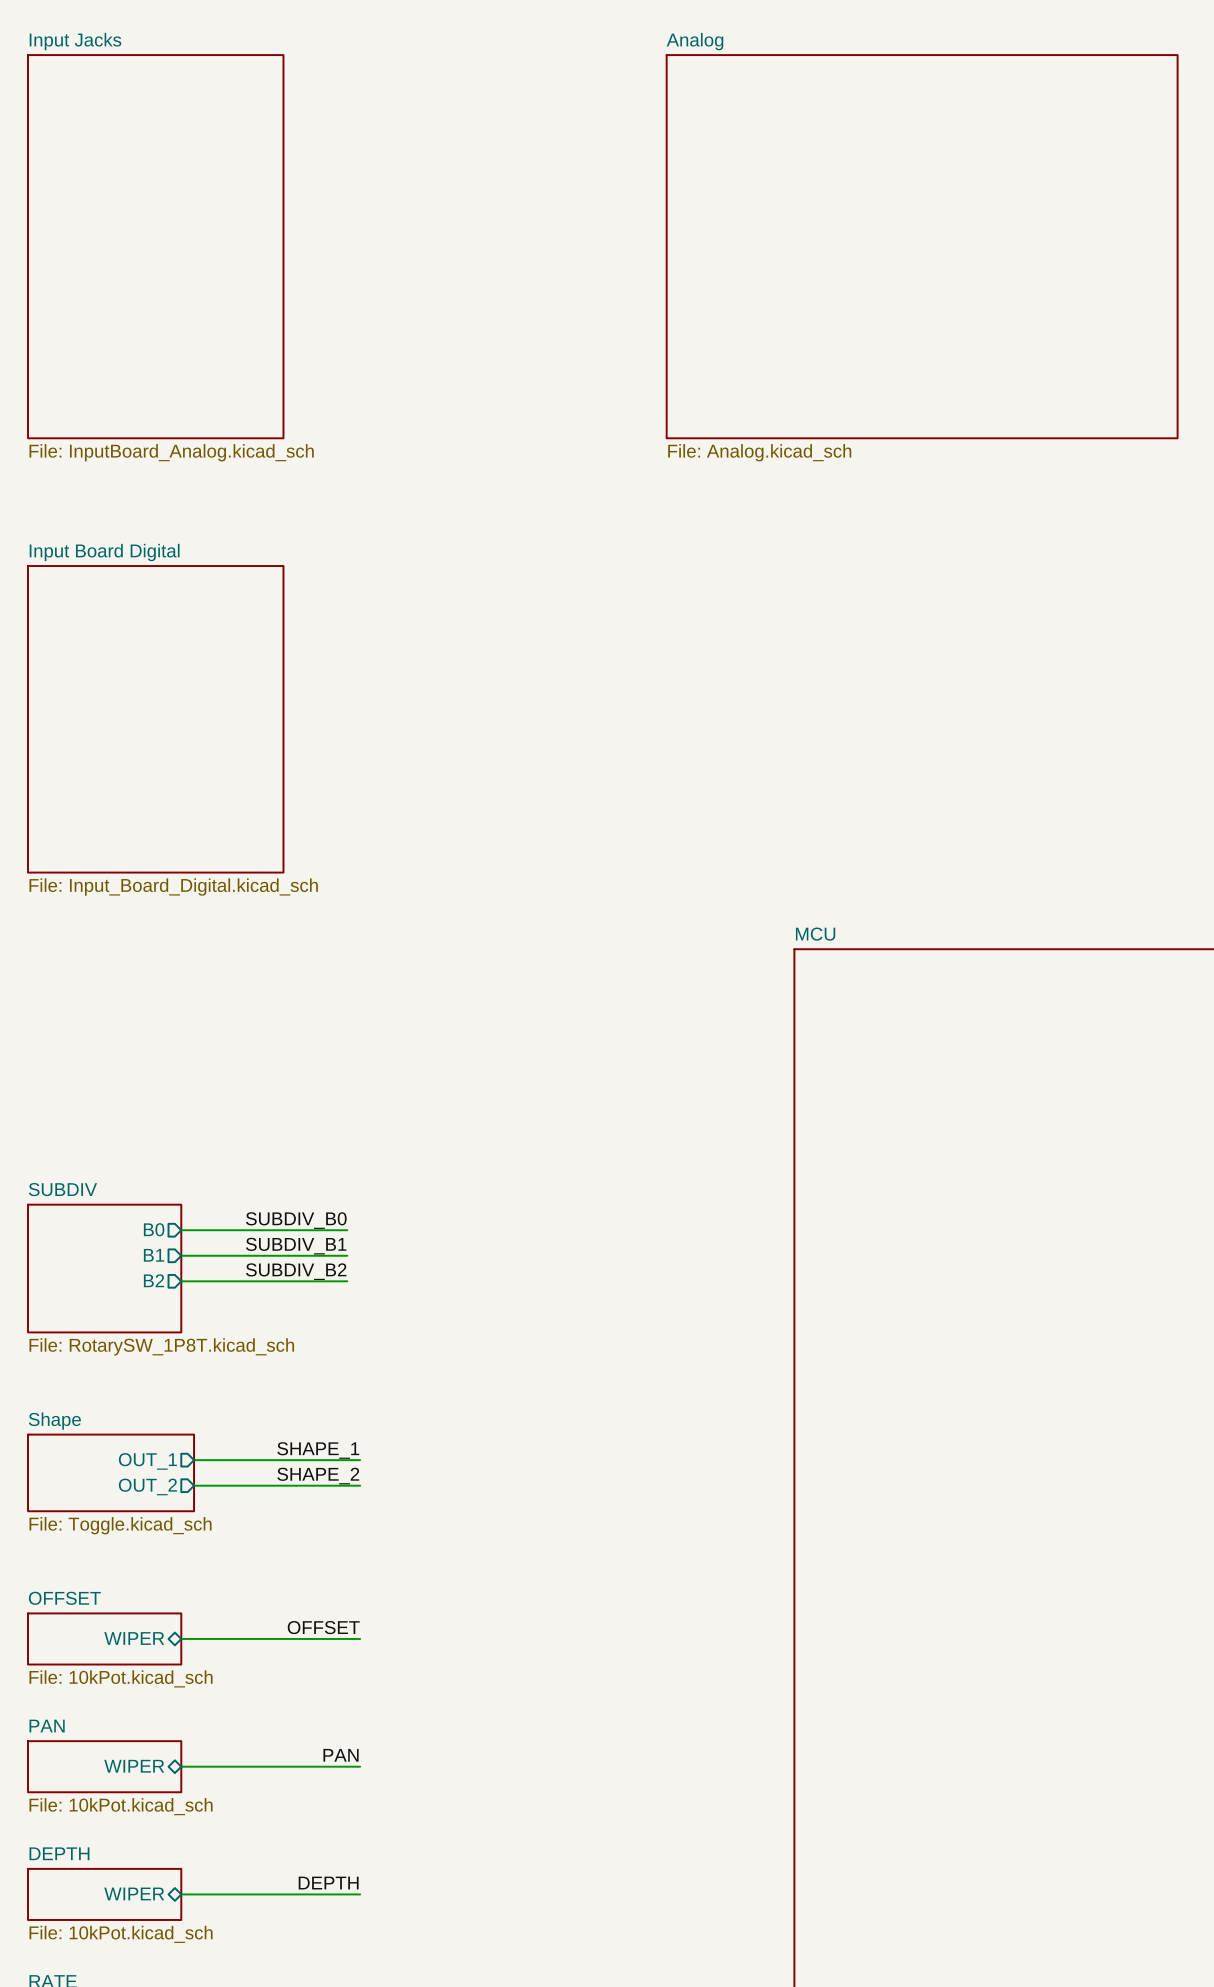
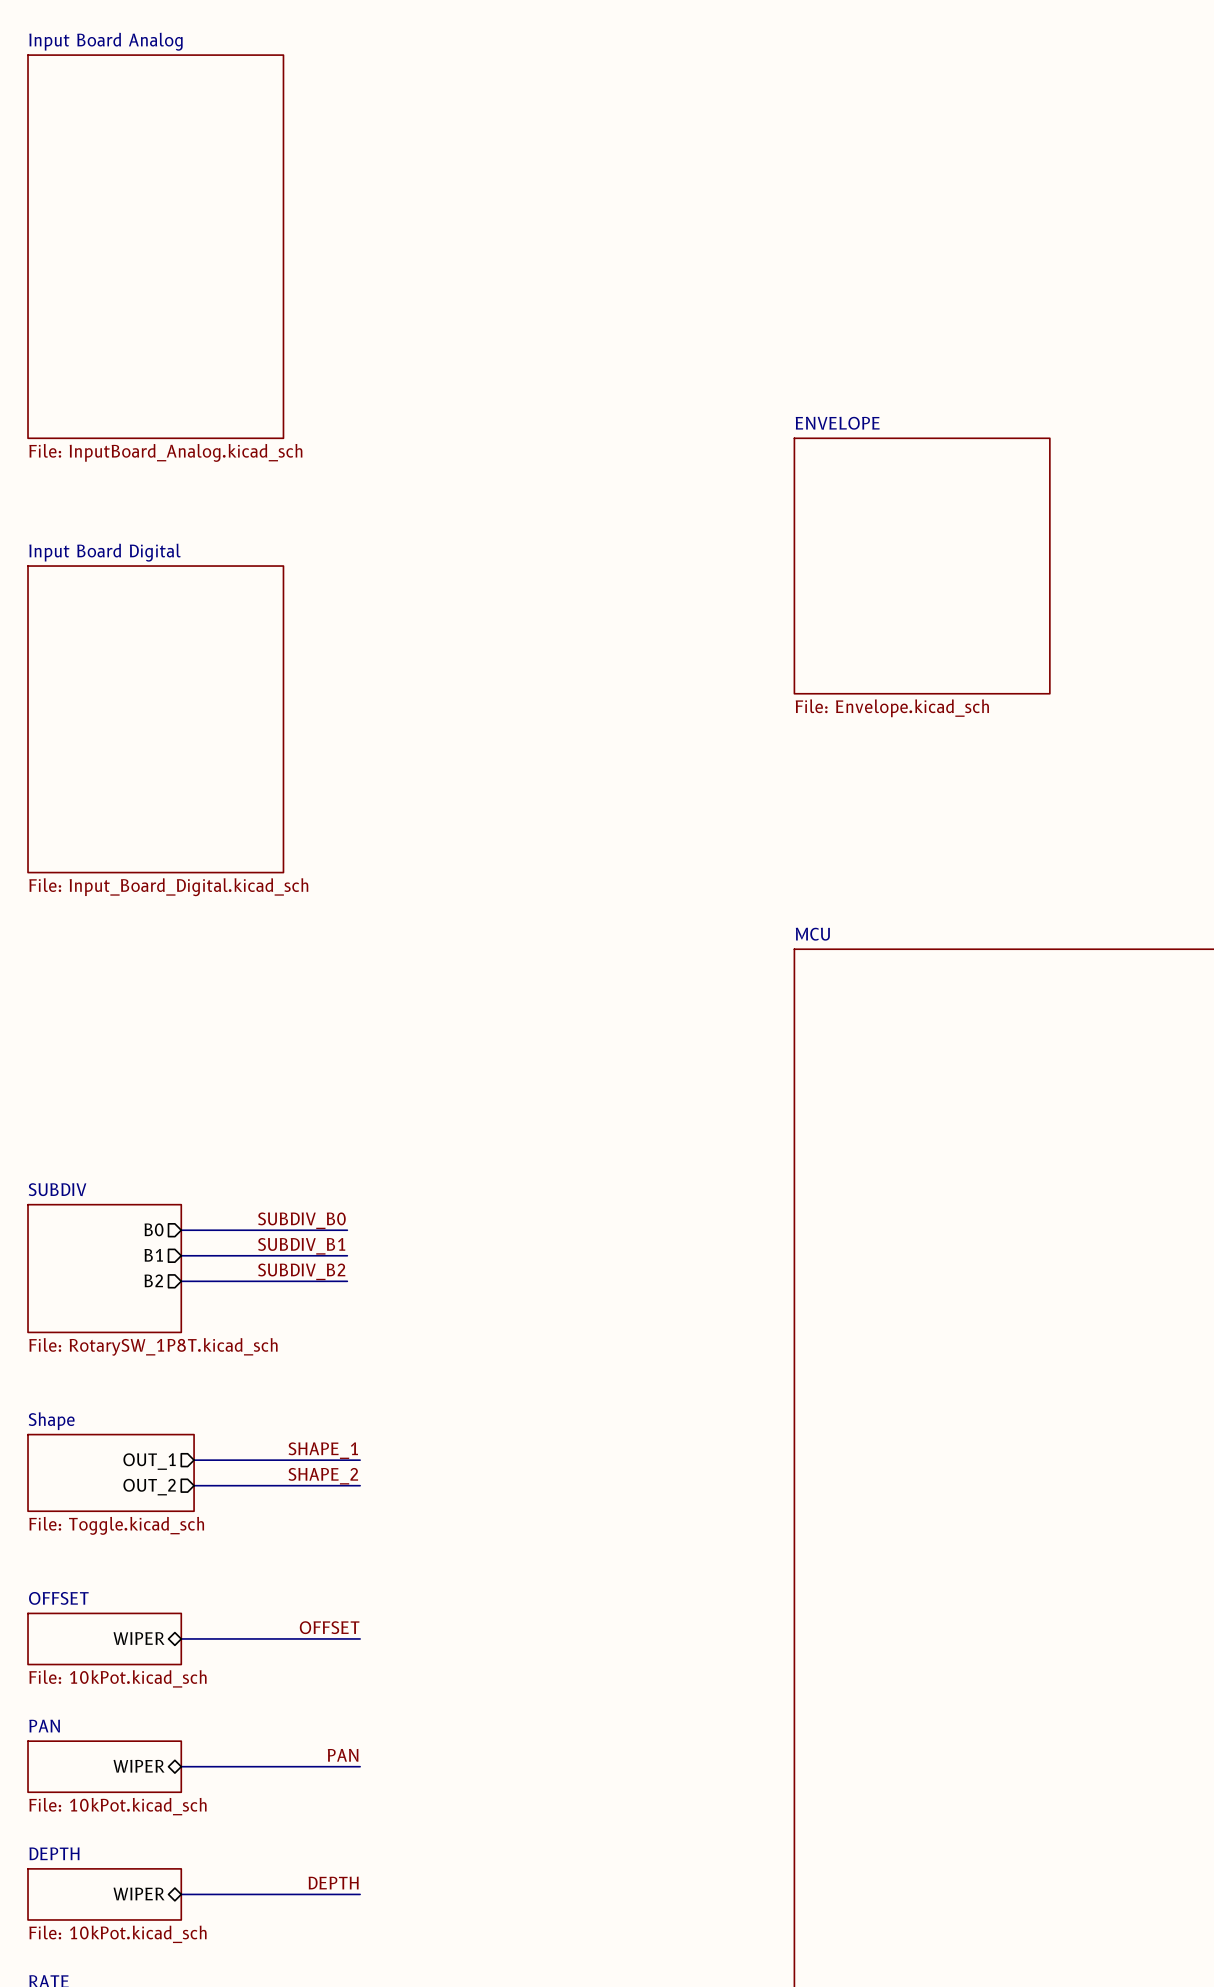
sheet Input Jacks name: Input Jacks (75, 41) -> Input Board Analog (105, 41)
sheet Analog: File: Analog.kicad_sch (922, 246) -> none
sheet ENVELOPE: none -> File: Envelope.kicad_sch (922, 566)

